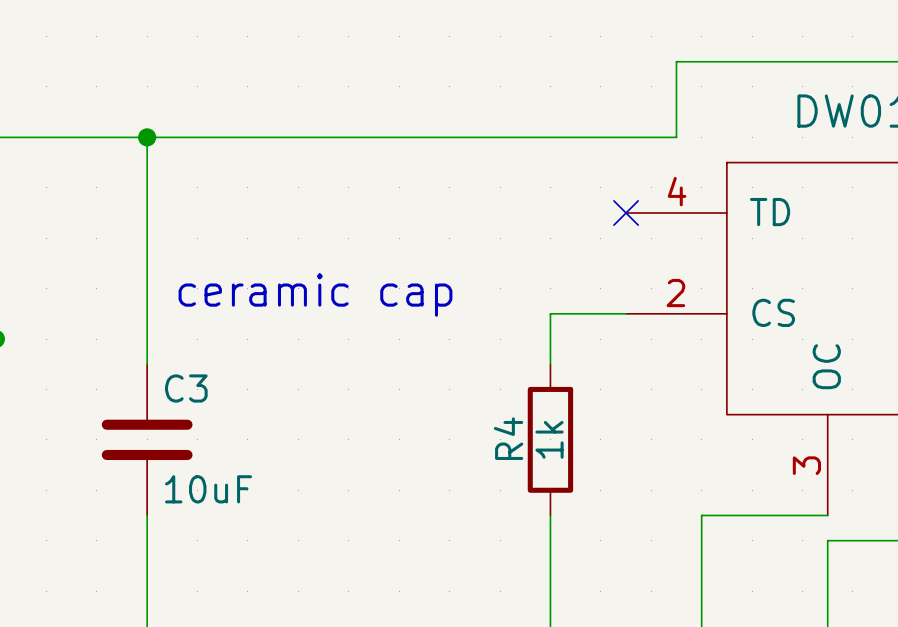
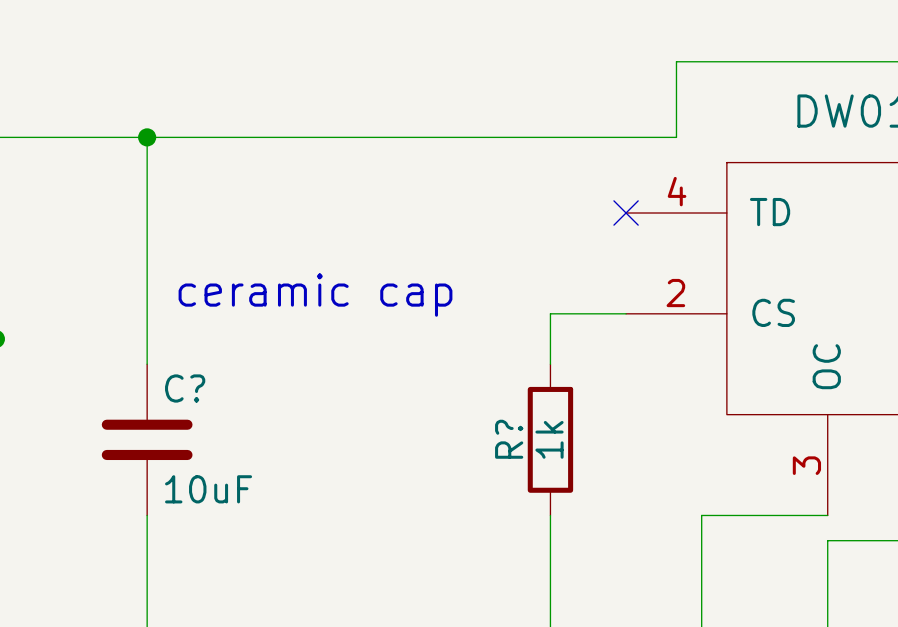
C3 name: C3 (186, 388) -> C? (185, 388)
R4 name: R4 (508, 438) -> R? (509, 439)

